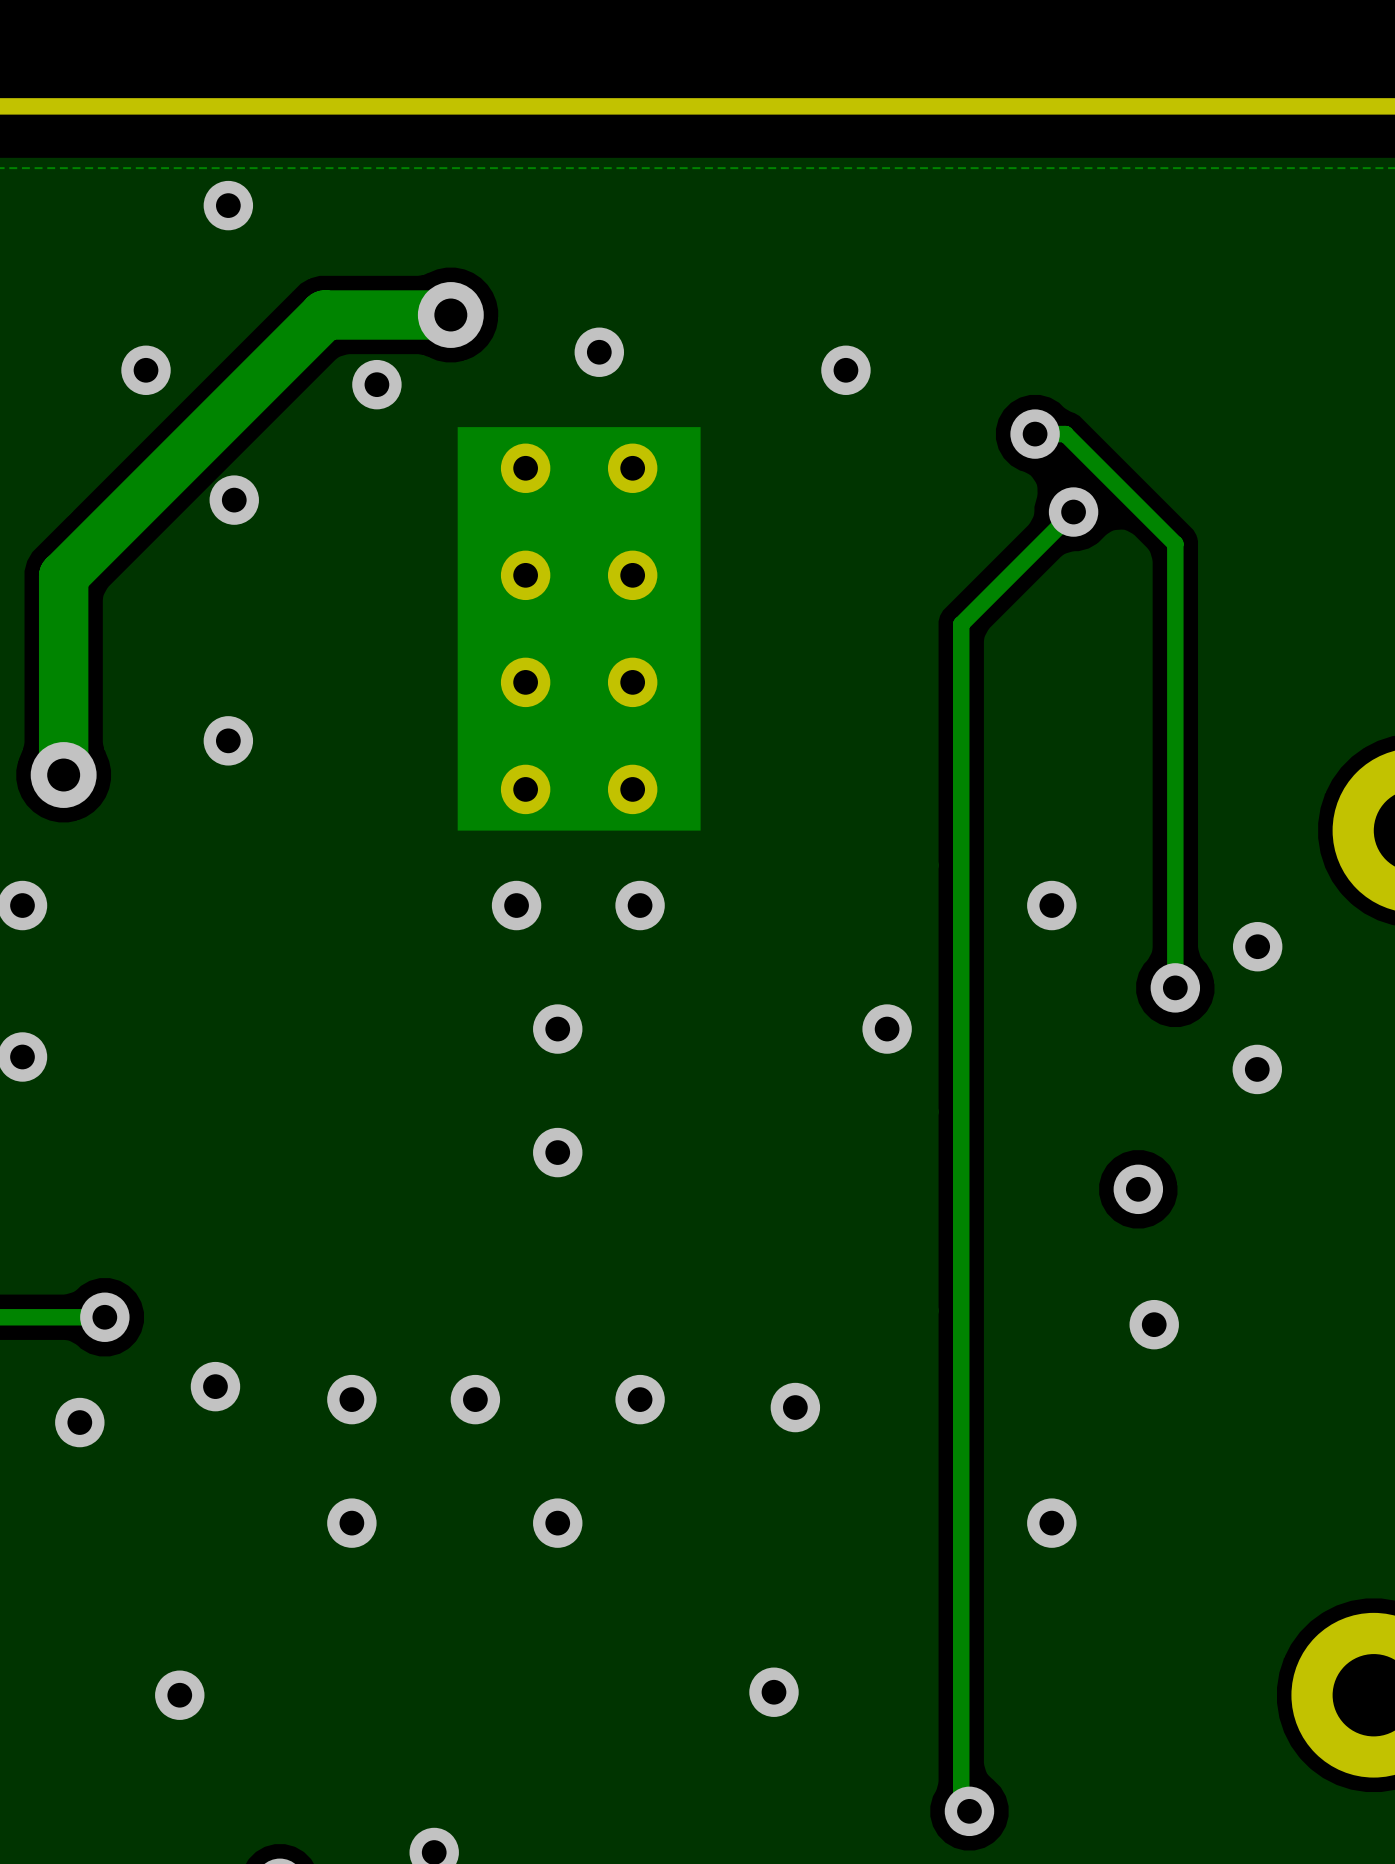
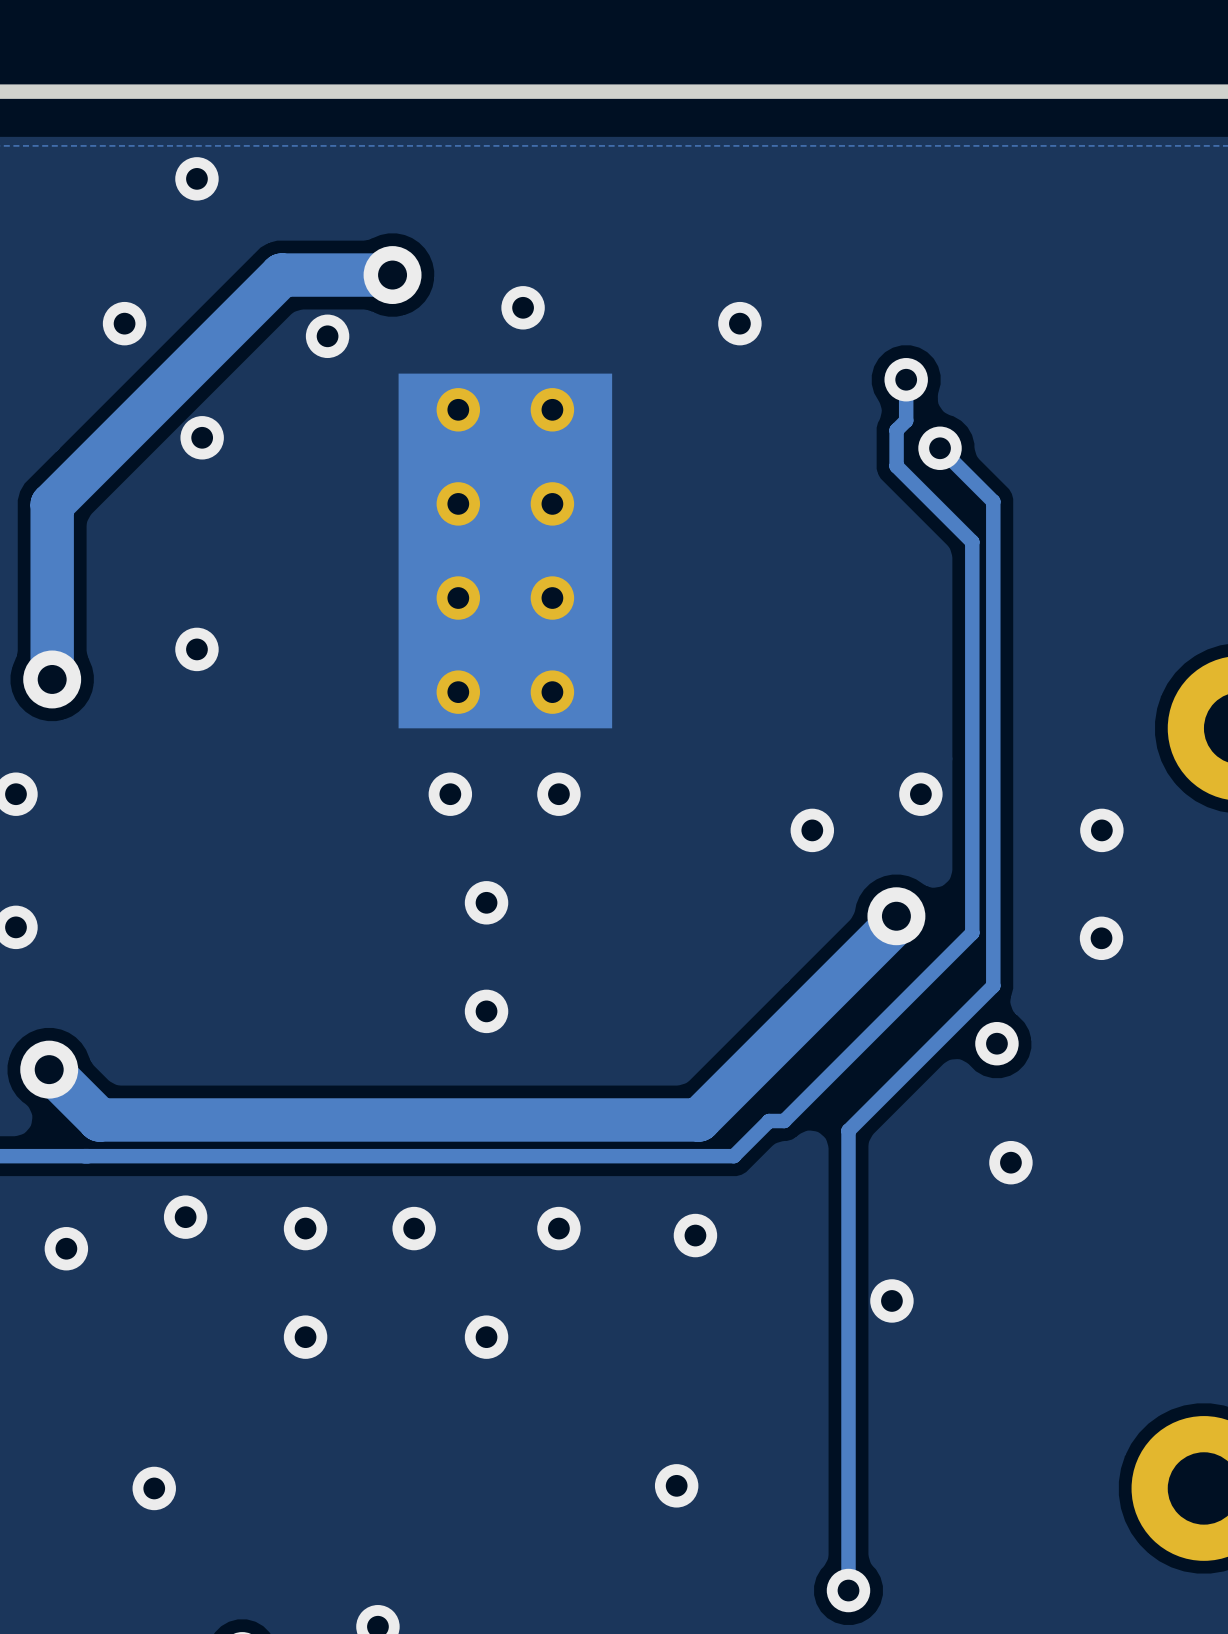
track: (1035, 434) (1065, 434) (1175, 543) (1175, 987) -> (906, 379) (906, 420) (896, 430) (896, 466) (972, 541) (972, 932) (784, 1121) (769, 1121) (733, 1156) (88, 1156)
track: (1073, 512) (961, 624) (961, 1803) (969, 1811) -> (940, 448) (993, 501) (993, 985) (848, 1130) (848, 1590)
via: (1175, 987) -> none
via position: (887, 1029) -> (812, 830)
track: none -> (896, 916) (896, 922) (698, 1119) (99, 1119) (49, 1069)
via: none -> (896, 916)
via: none -> (49, 1069)
via: (104, 1317) -> none
via position: (1051, 1523) -> (891, 1300)

